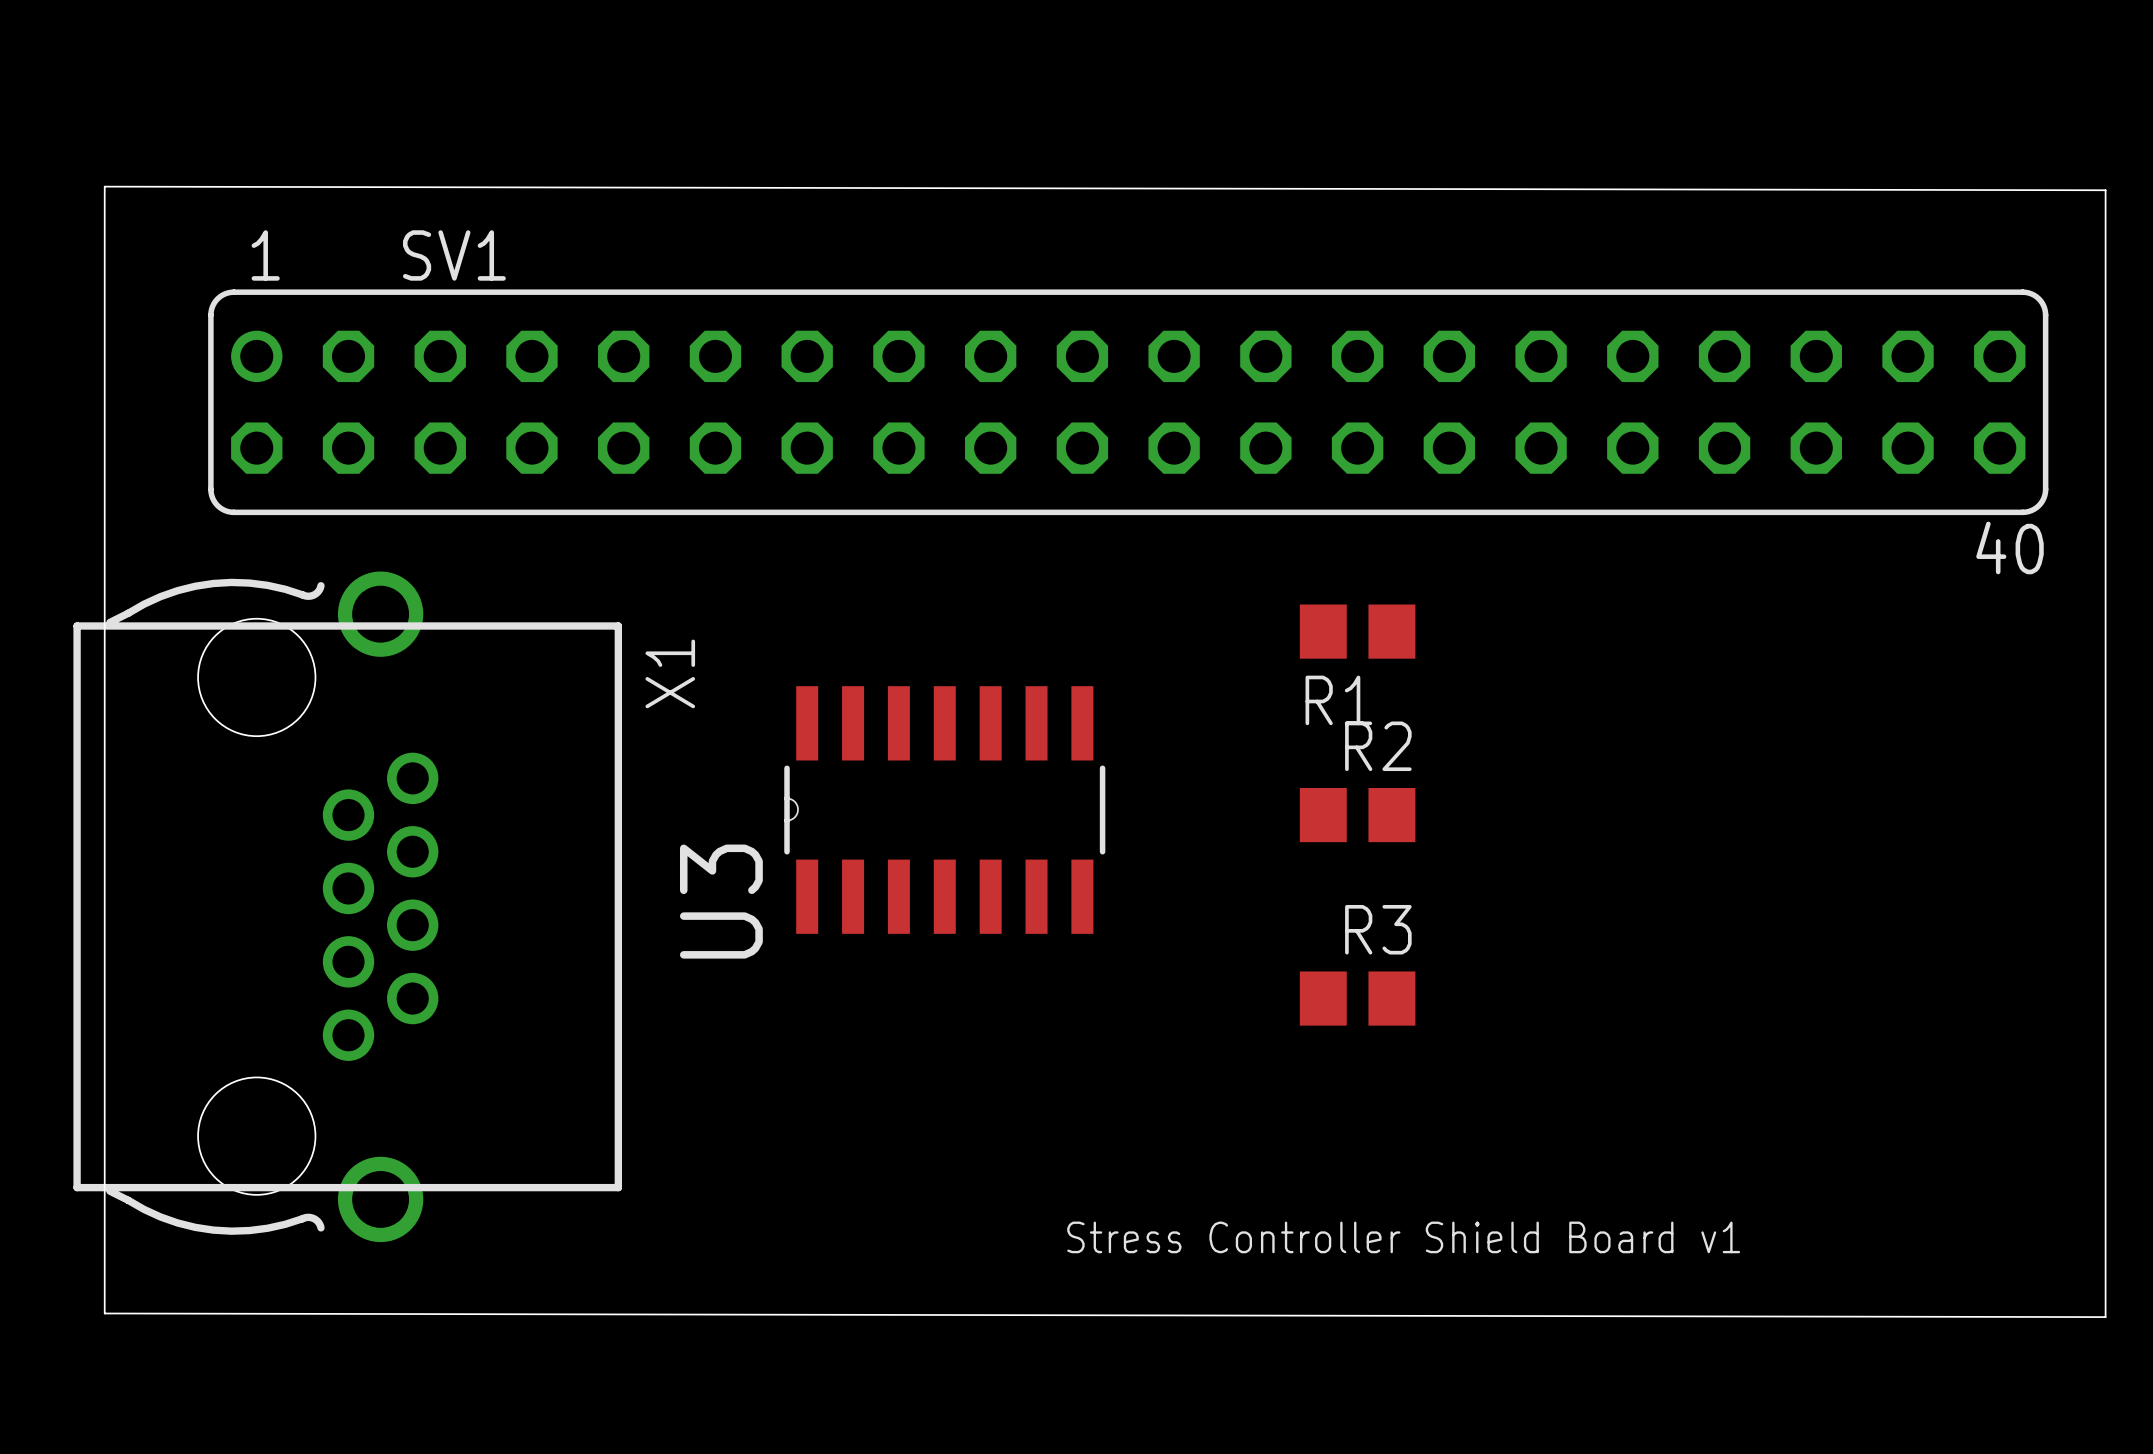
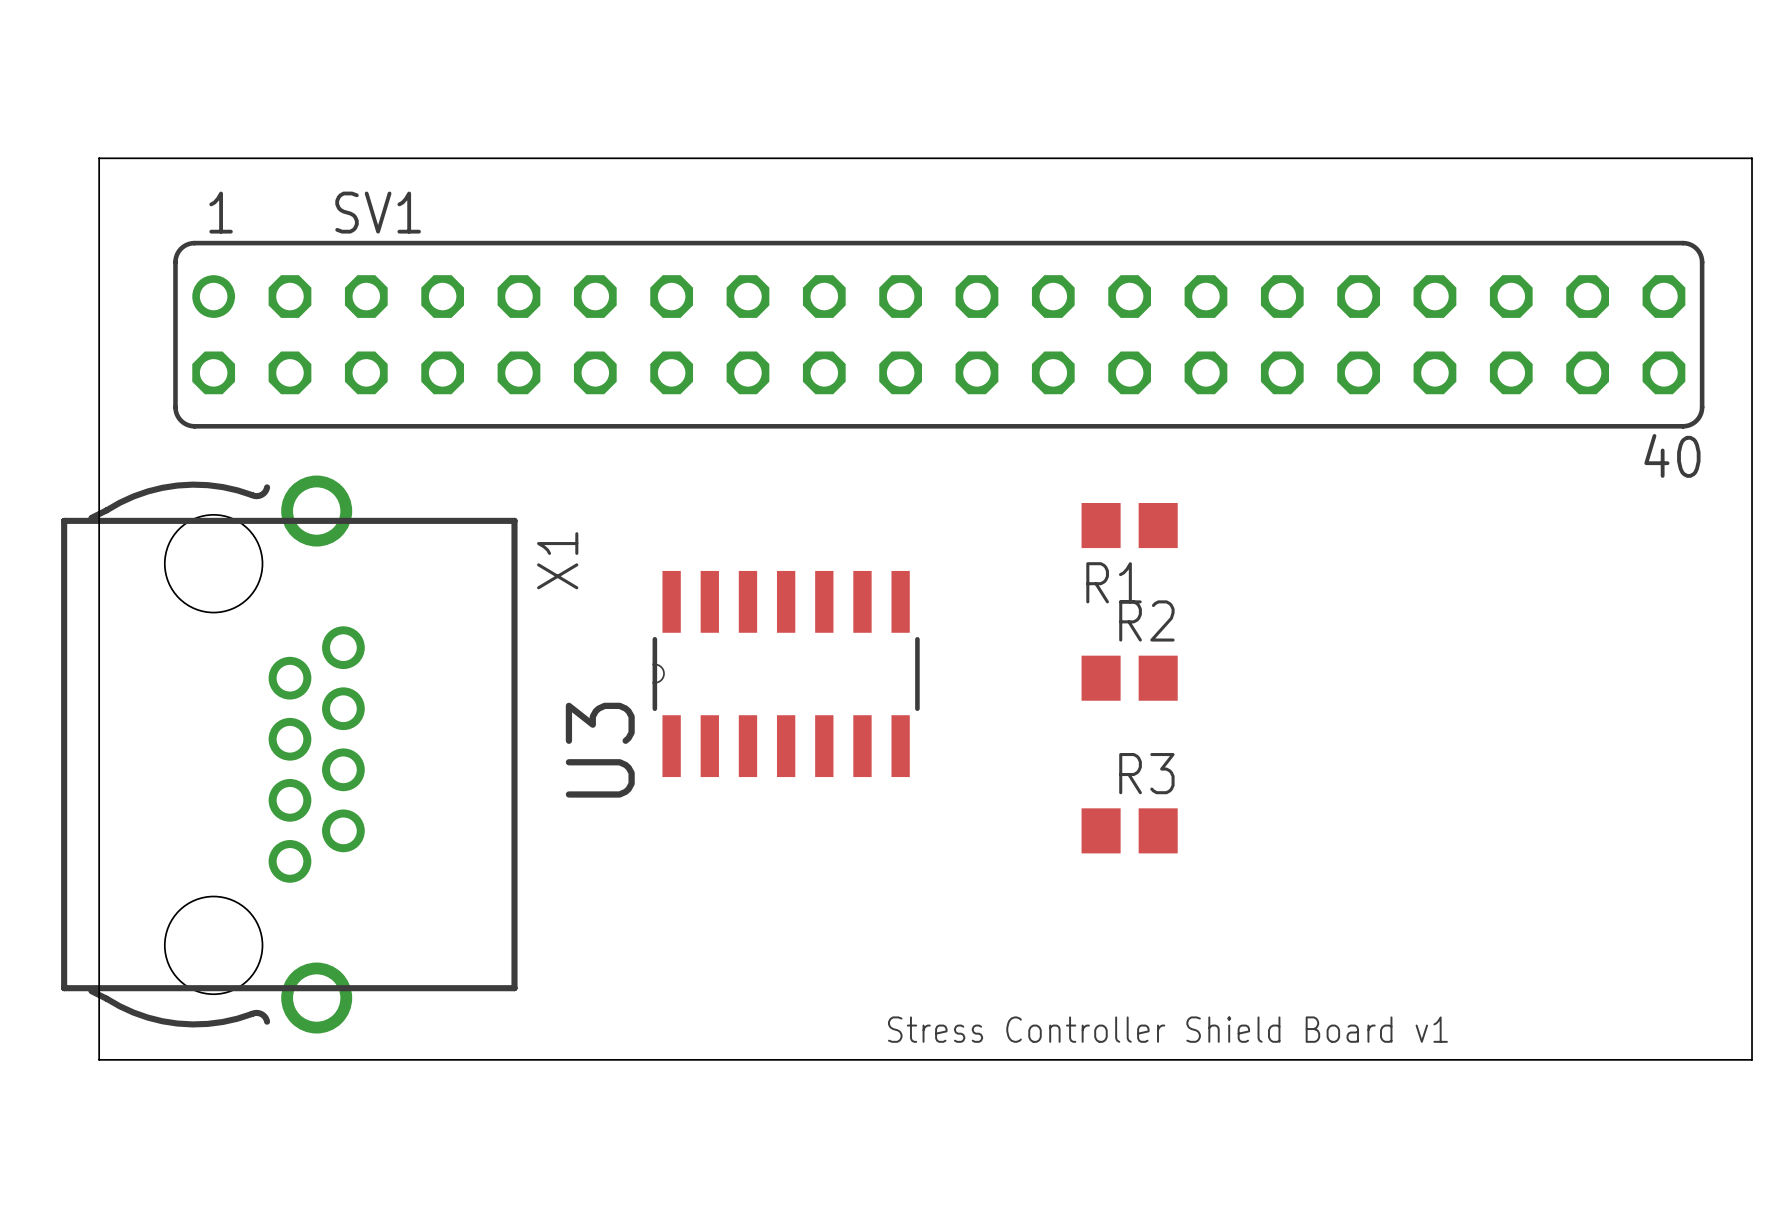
board edge: (2105, 190) (104, 186) (104, 1313) (2105, 1317) (2105, 1273) -> (1752, 158) (99, 158) (99, 1059) (1752, 1059)

